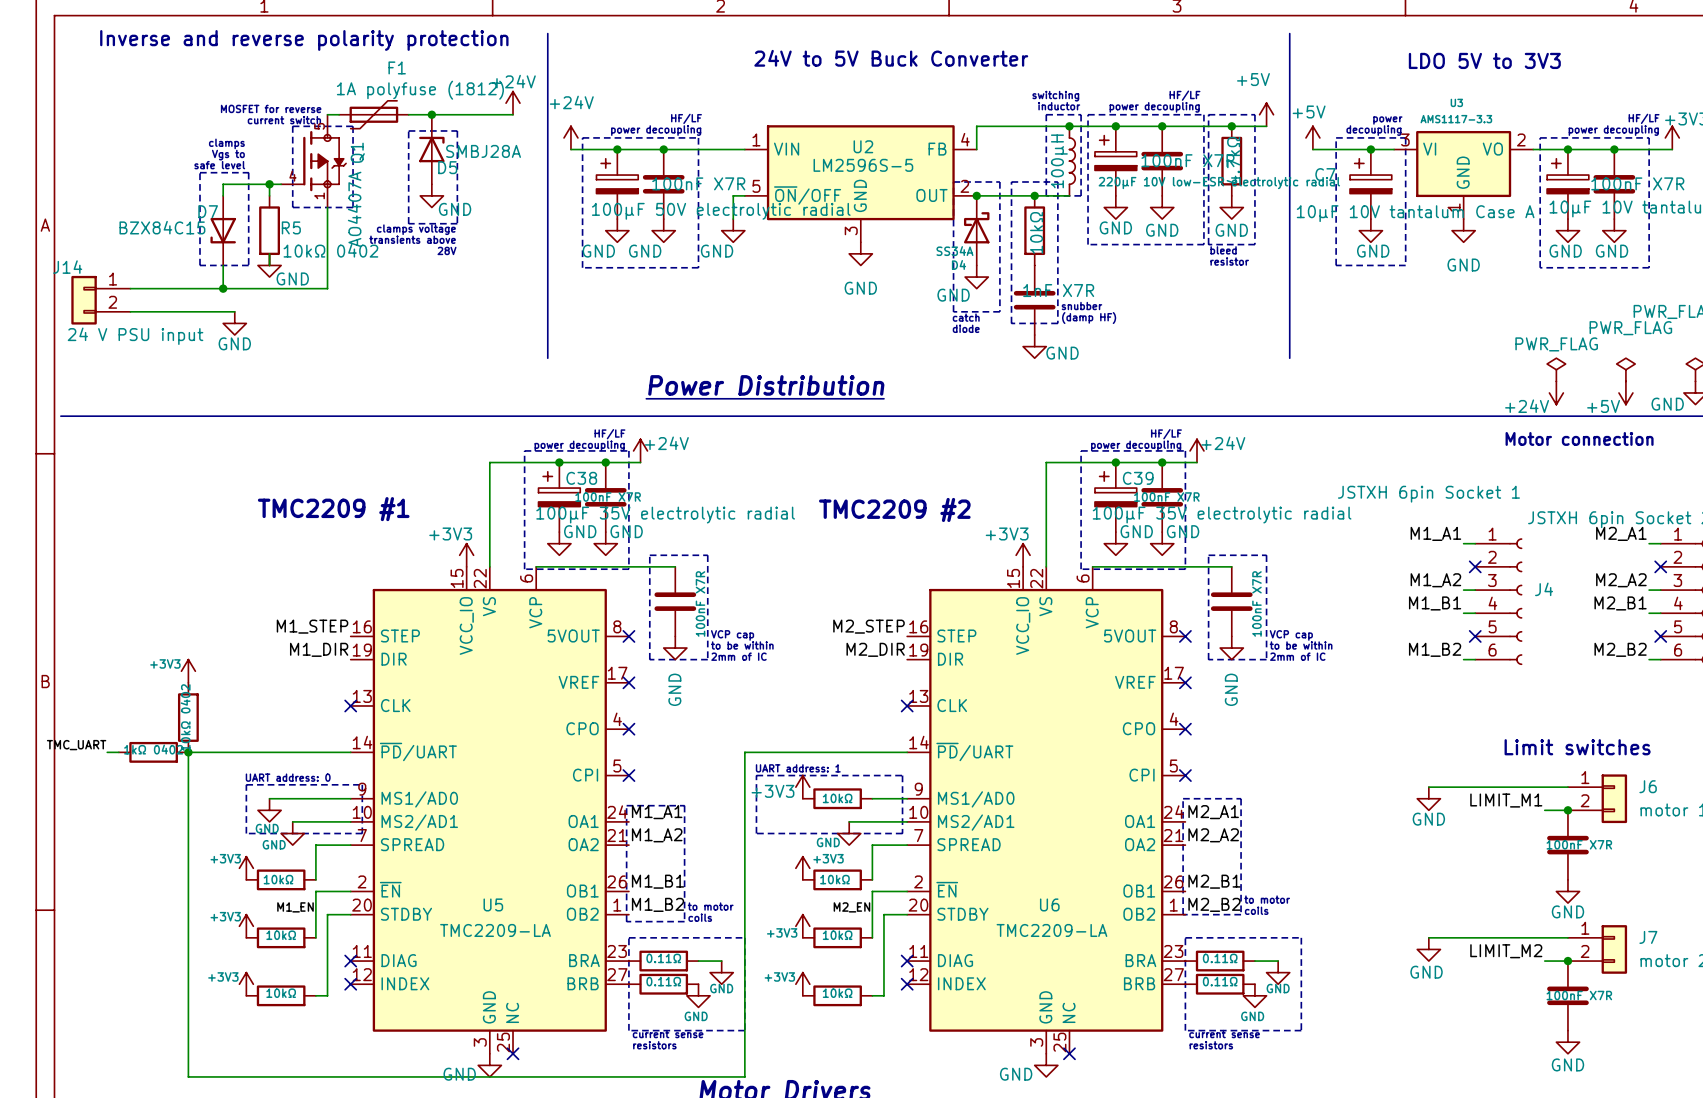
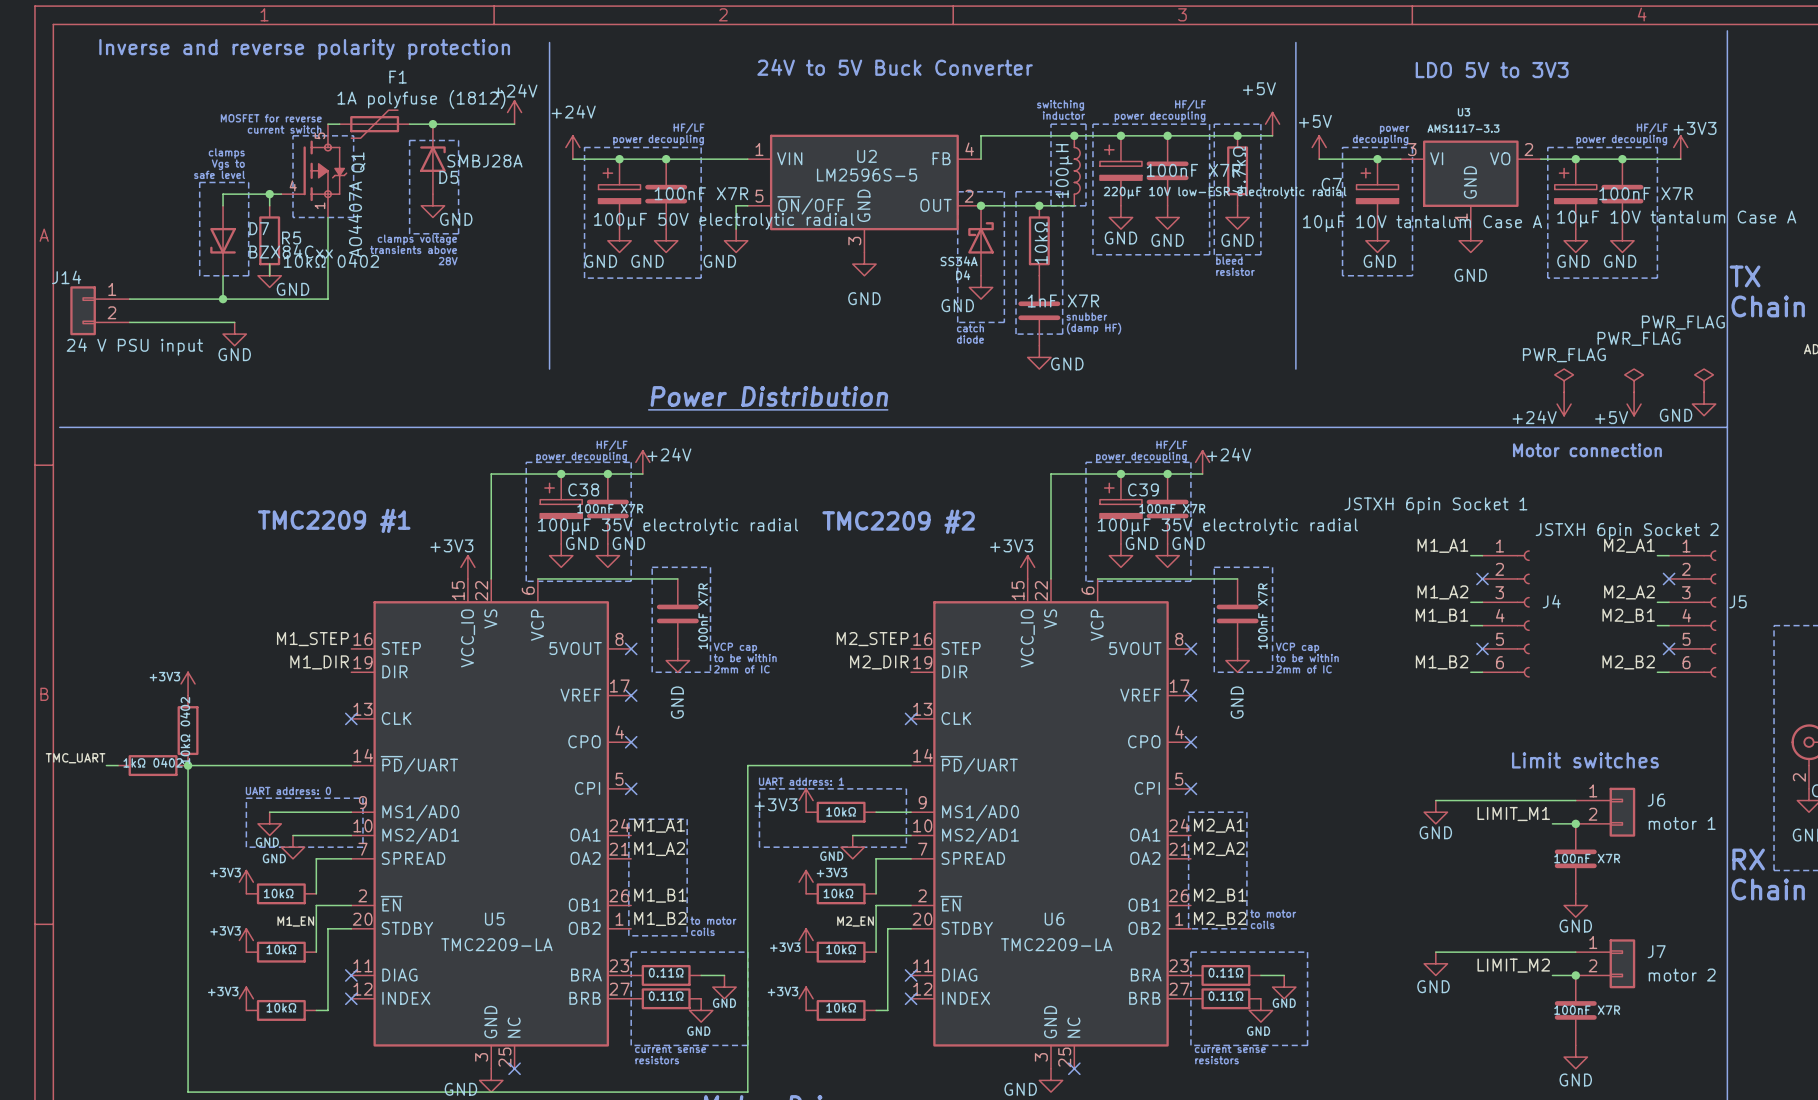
D7 name position: D7 (208, 211) -> D7 (259, 228)
D7 value: BZX84C15 (162, 227) -> BZX84Cxx (291, 251)

